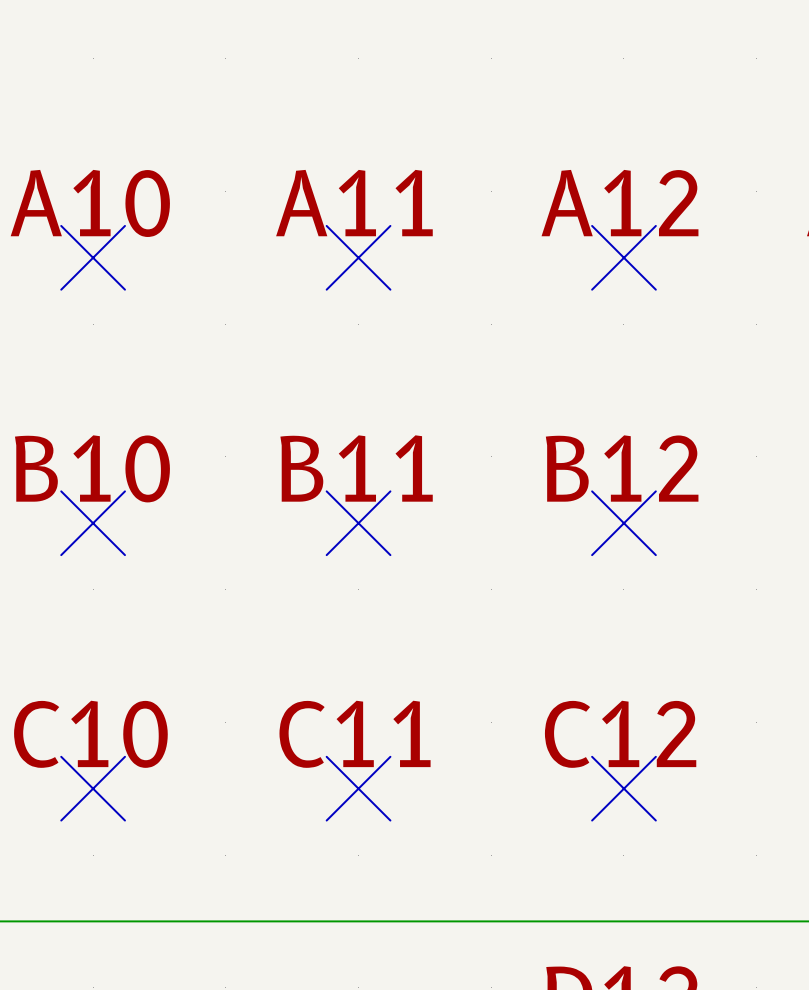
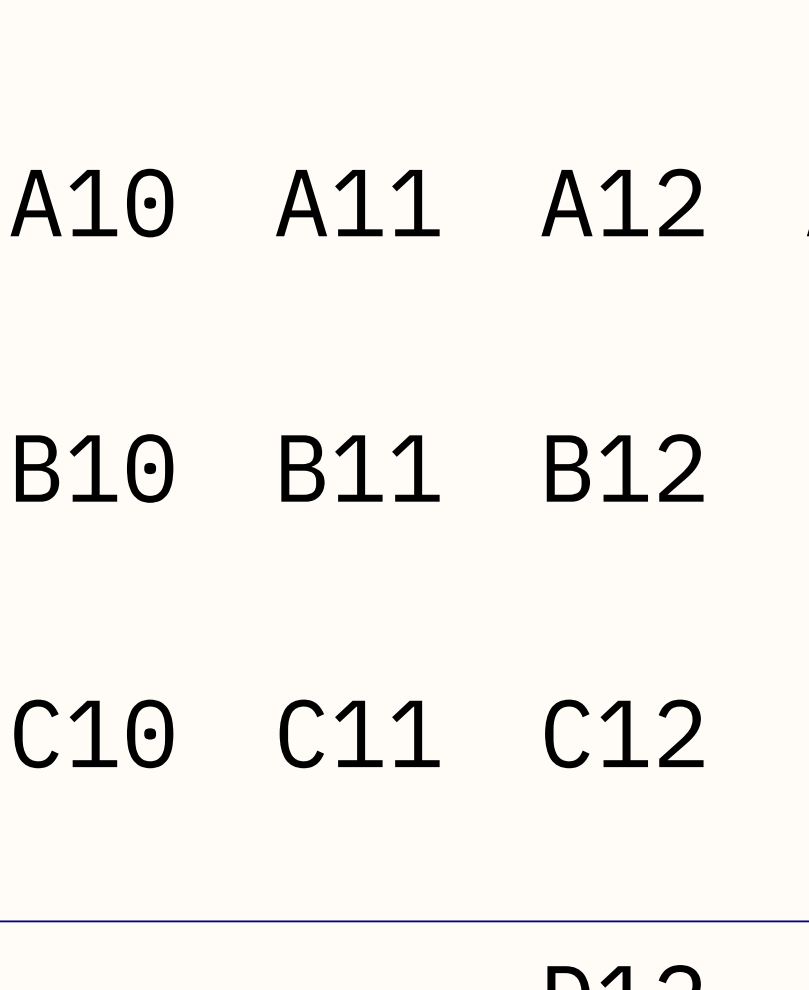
no-connect mark: (93, 257) -> none
no-connect mark: (358, 257) -> none
no-connect mark: (623, 257) -> none
no-connect mark: (93, 523) -> none
no-connect mark: (358, 523) -> none
no-connect mark: (623, 523) -> none
no-connect mark: (93, 788) -> none
no-connect mark: (358, 788) -> none
no-connect mark: (623, 788) -> none

